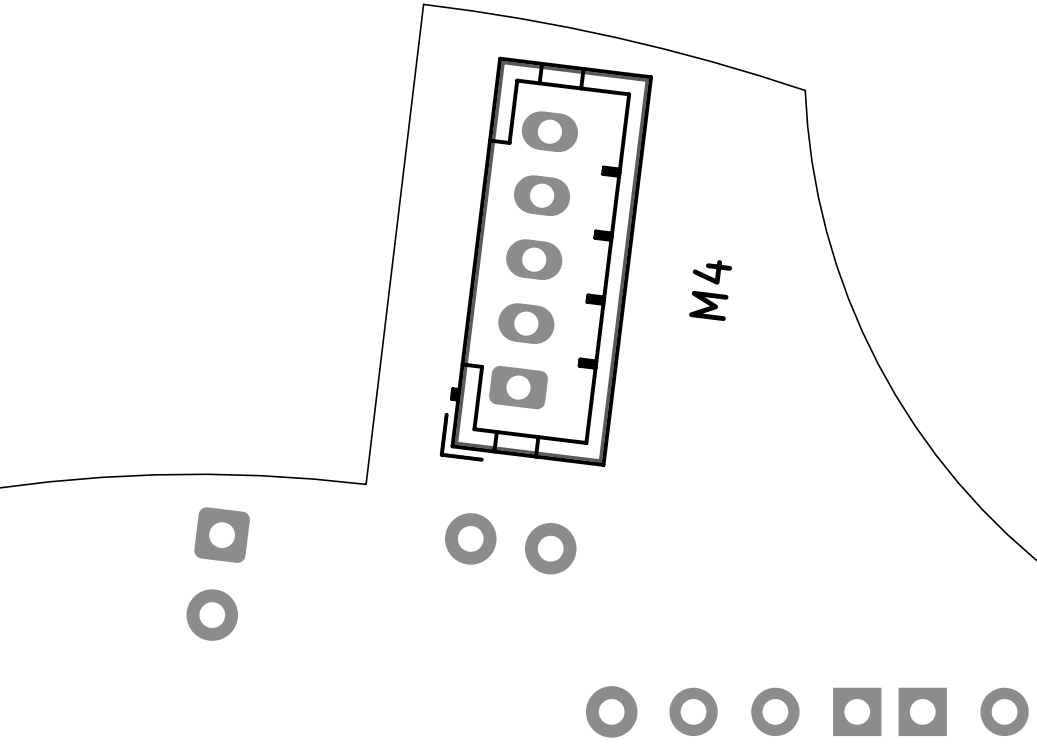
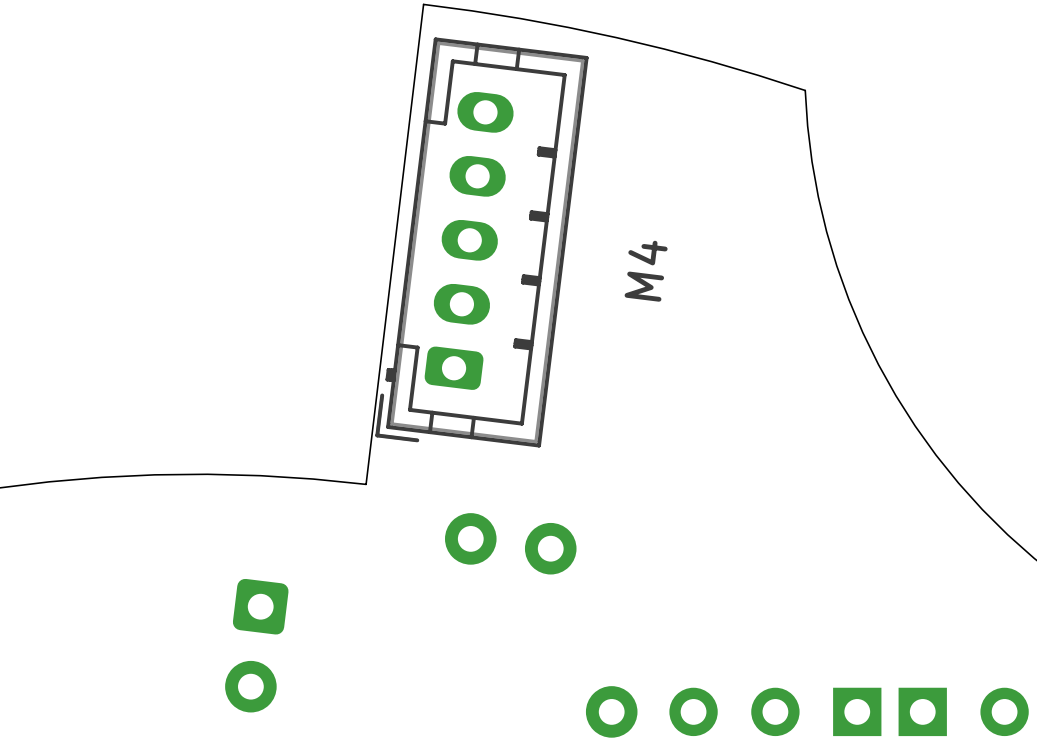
M4 position: (546, 261) -> (481, 242)
part position: (218, 574) -> (256, 645)

